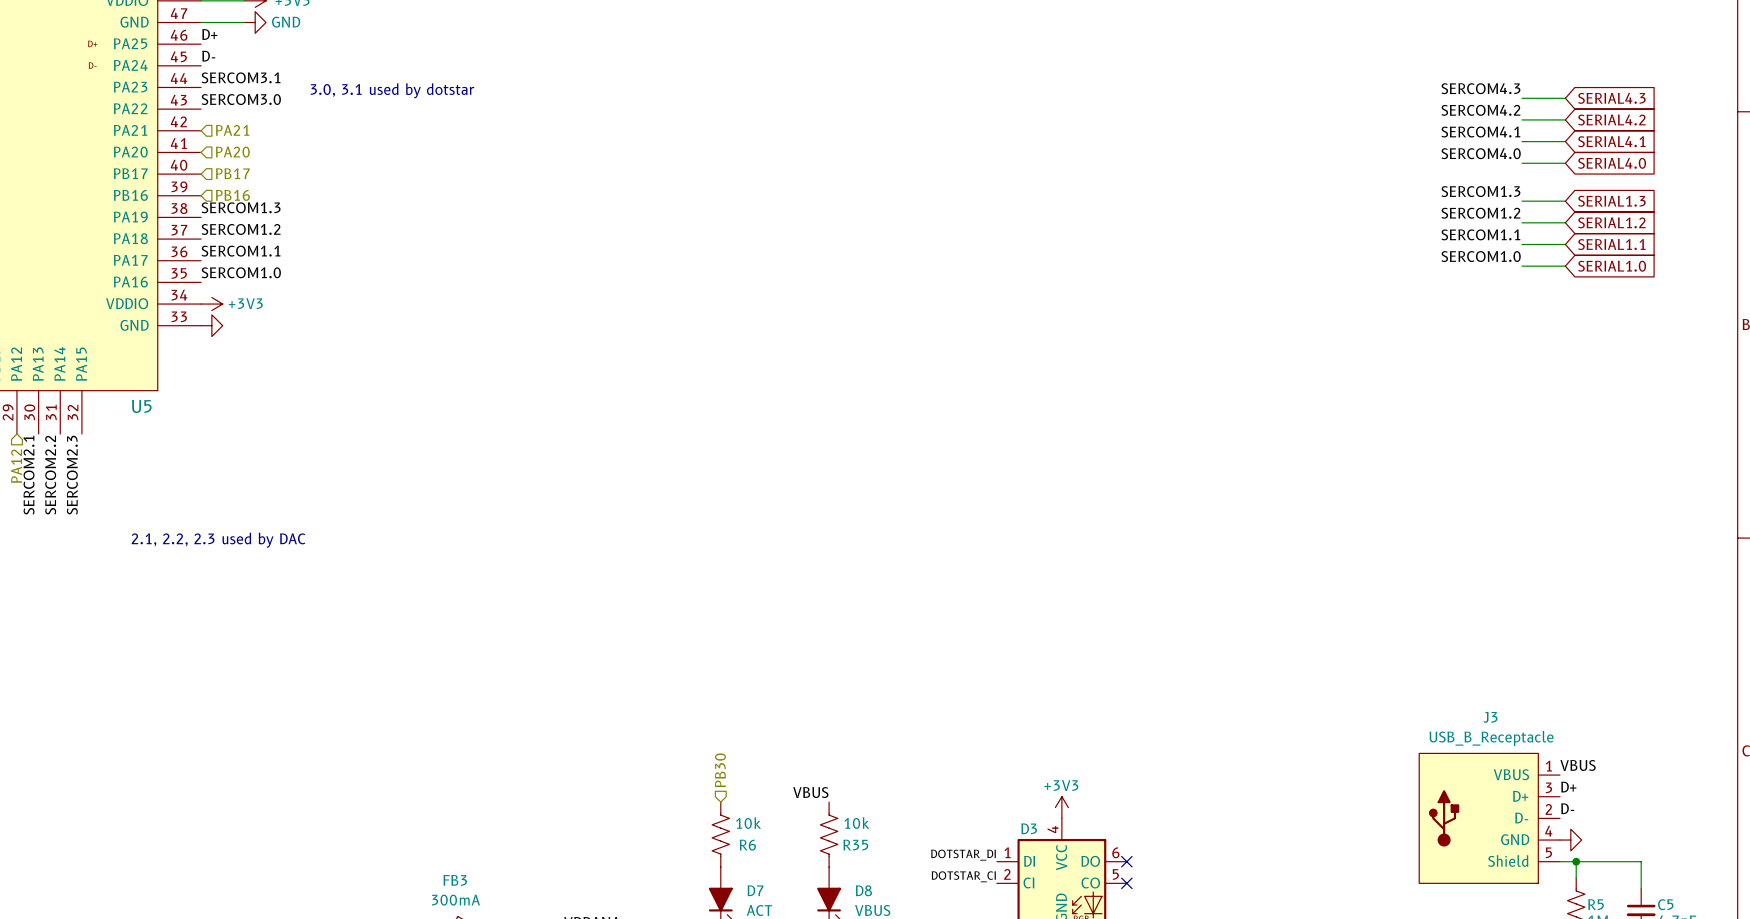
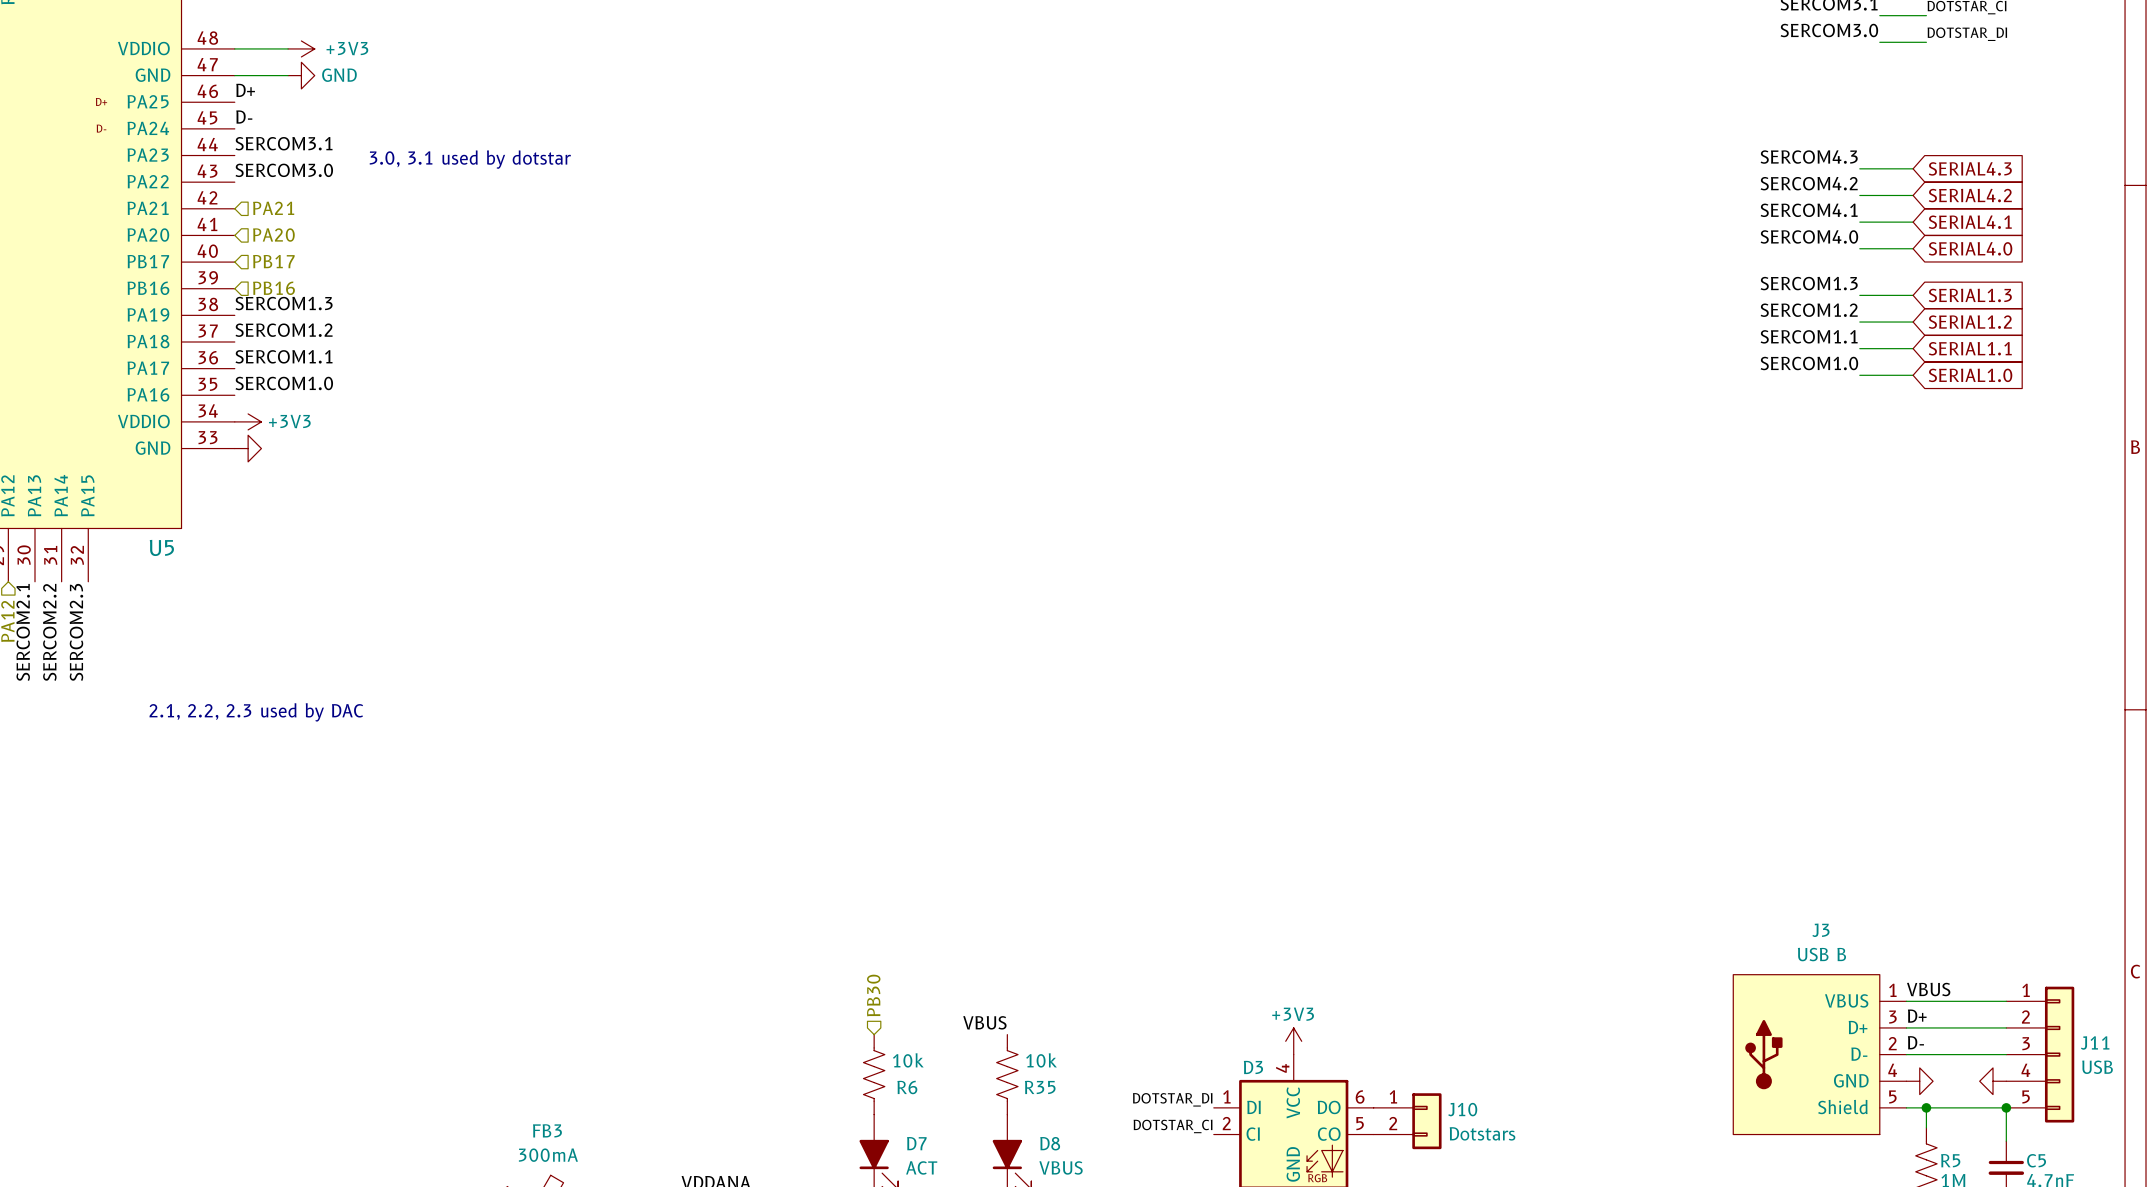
J3 value: USB_B_Receptacle (1491, 738) -> USB B (1821, 954)
wire: none -> (1906, 1001) (2006, 1001)
wire: none -> (1906, 1027) (2006, 1027)
wire: none -> (1906, 1054) (2006, 1054)
J11: none -> USB (2040, 1054)
power symbol: none -> (1993, 1081)
no-connect mark: (1126, 861) -> none
junction: none -> (2006, 1107)
J10: none -> Dotstars (1407, 1121)
no-connect mark: (1126, 883) -> none

